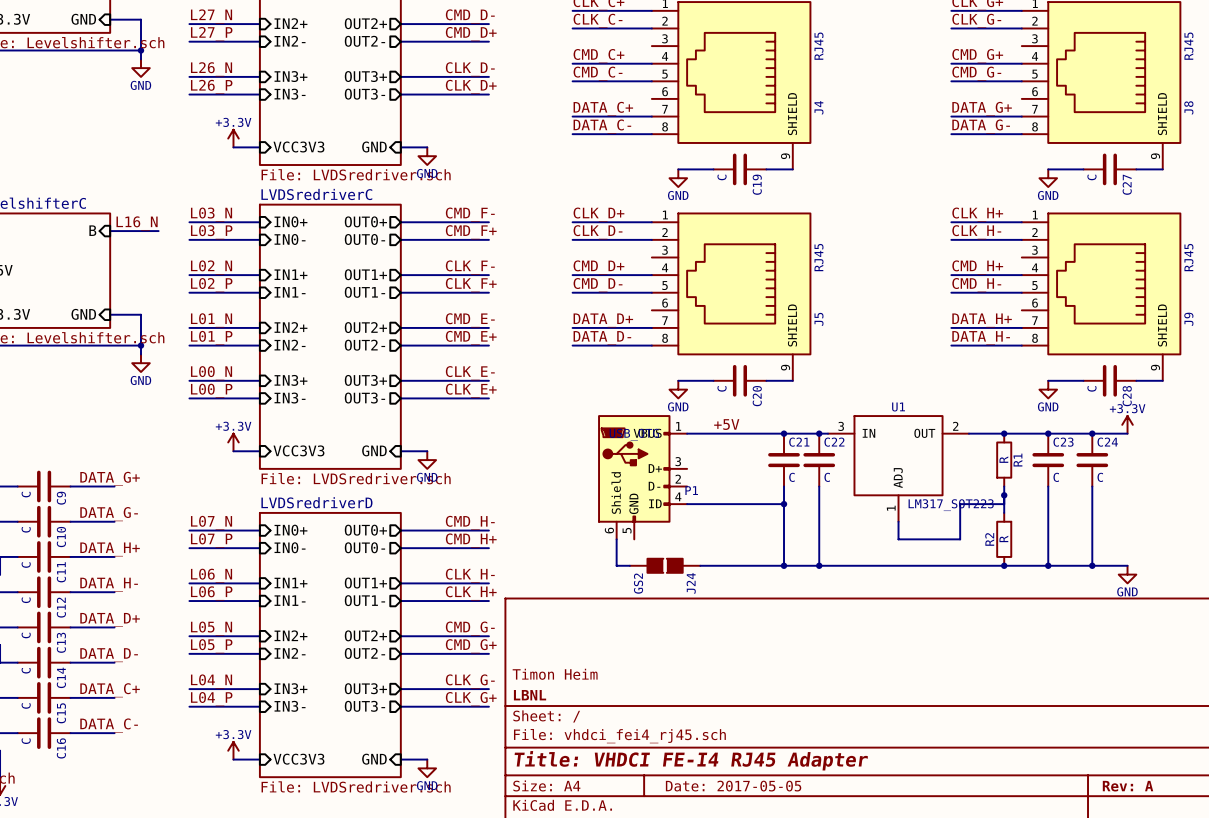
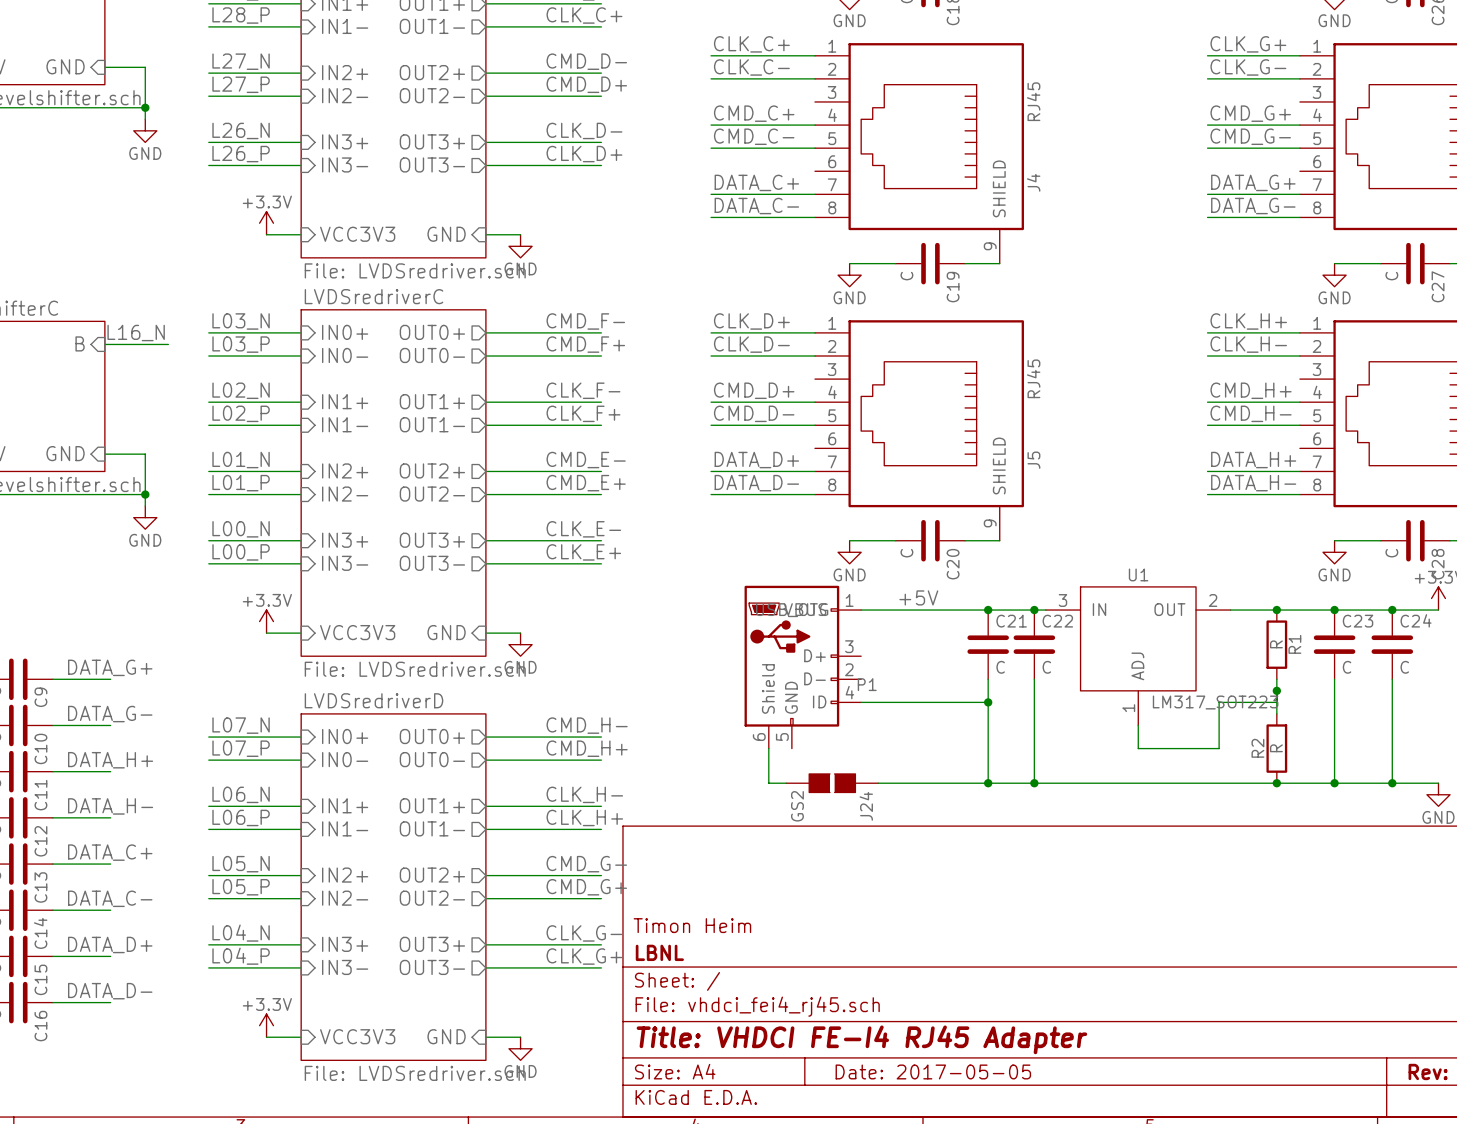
label: DATA_D+ (110, 619) -> DATA_C+ (110, 852)
label: DATA_D- (109, 655) -> DATA_C- (110, 898)
label: DATA_C+ (110, 690) -> DATA_D+ (110, 944)
label: DATA_C- (109, 725) -> DATA_D- (110, 991)

